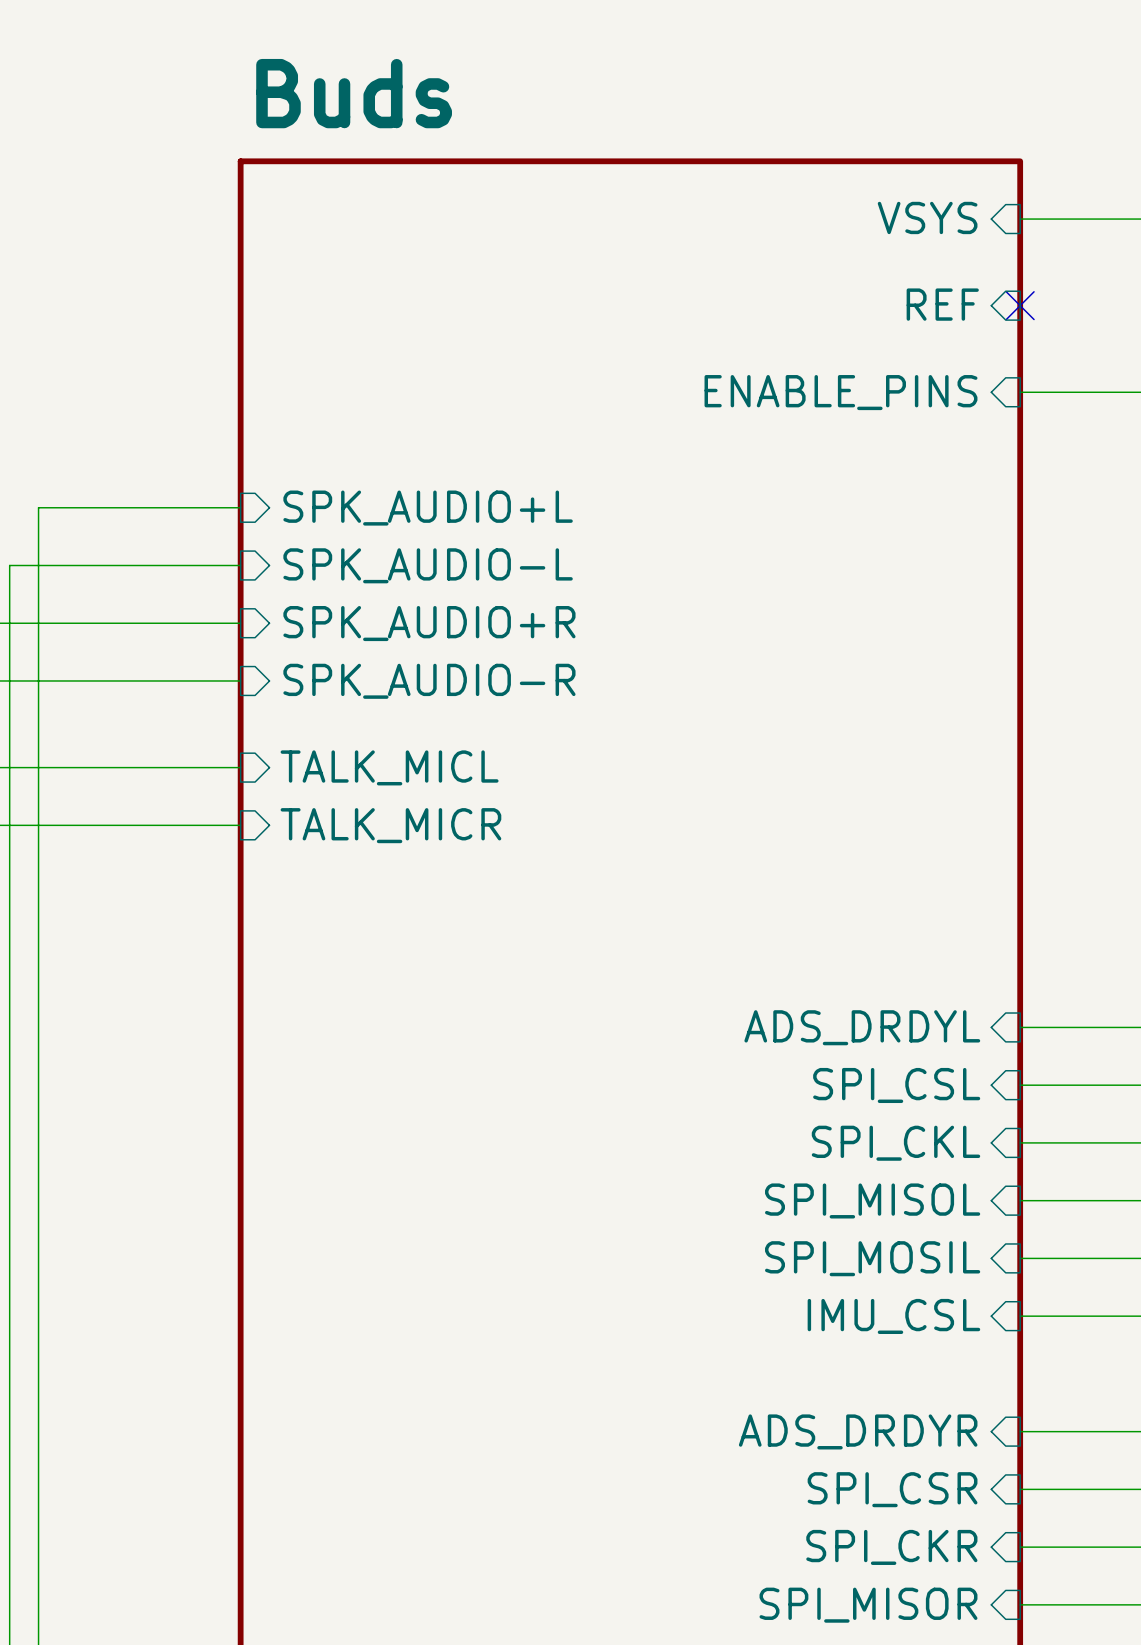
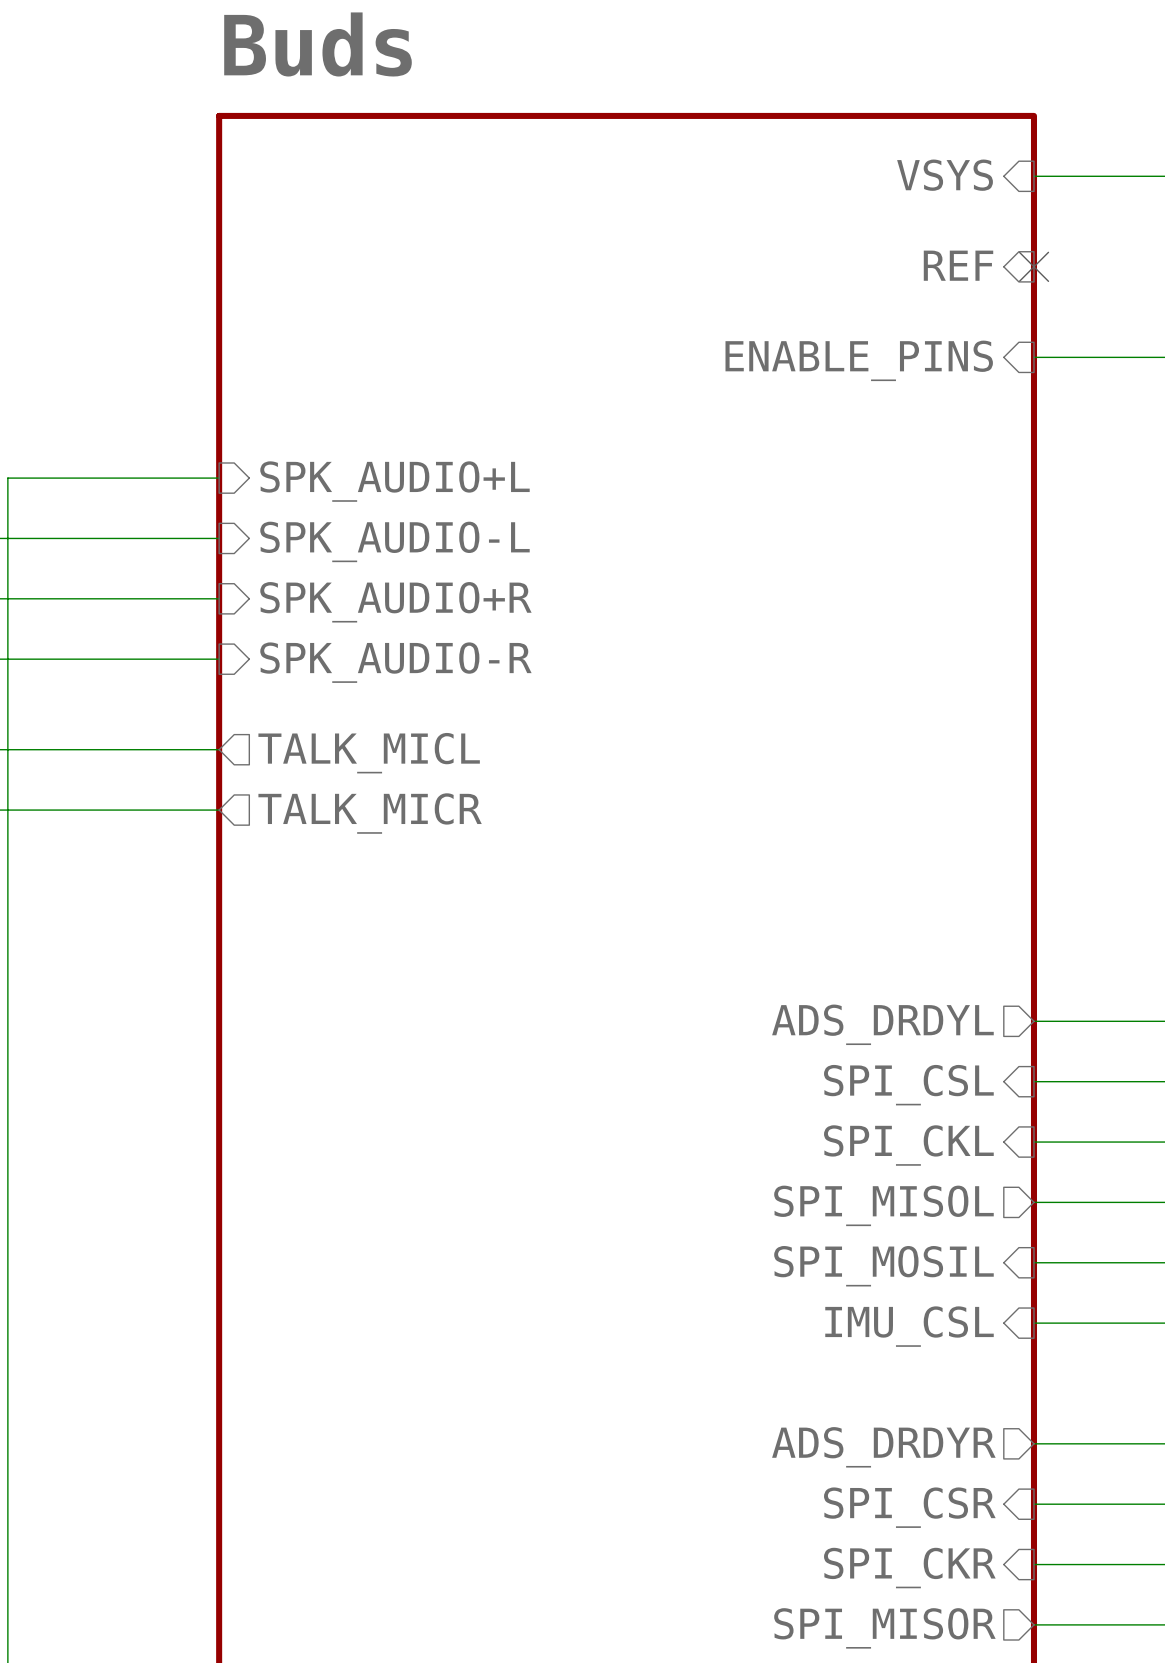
sheet pin shape: input (389, 767) -> output (369, 753)
sheet pin shape: input (390, 825) -> output (370, 813)
sheet pin shape: input (862, 1027) -> output (882, 1024)
sheet pin shape: input (872, 1200) -> output (883, 1205)
sheet pin shape: input (858, 1431) -> output (883, 1447)
sheet pin shape: input (868, 1605) -> output (884, 1628)

